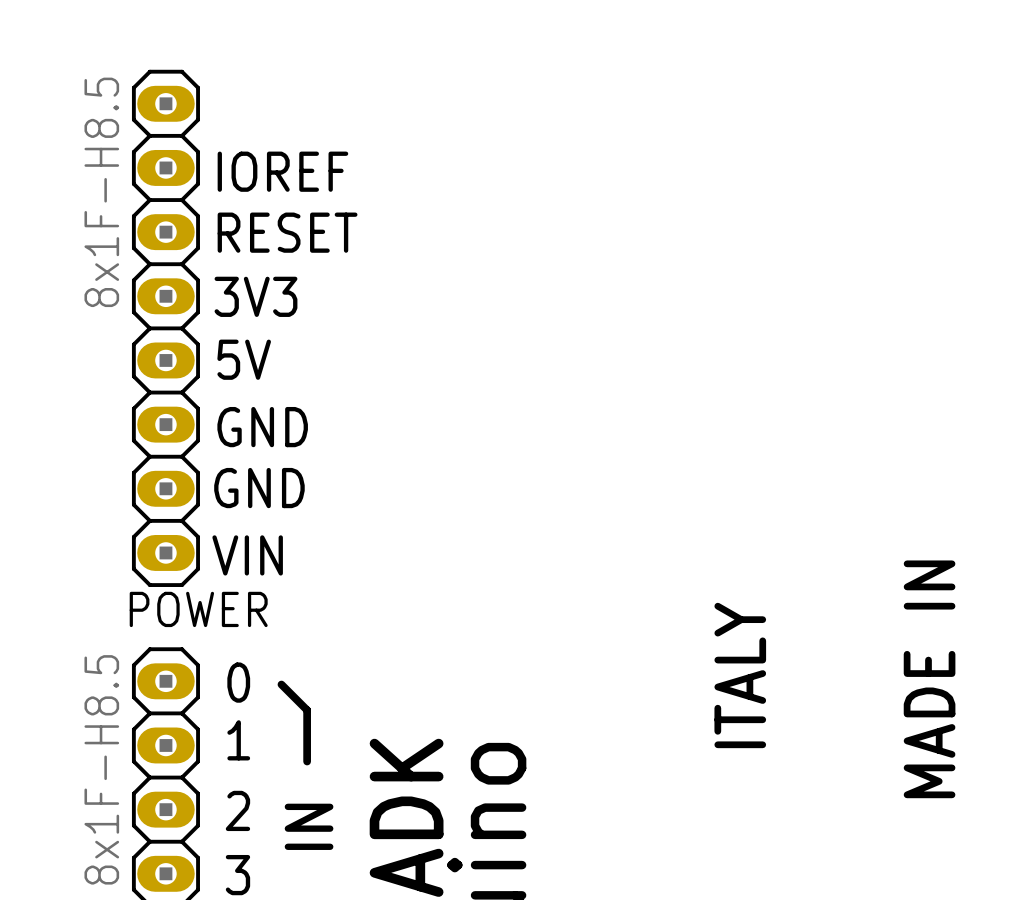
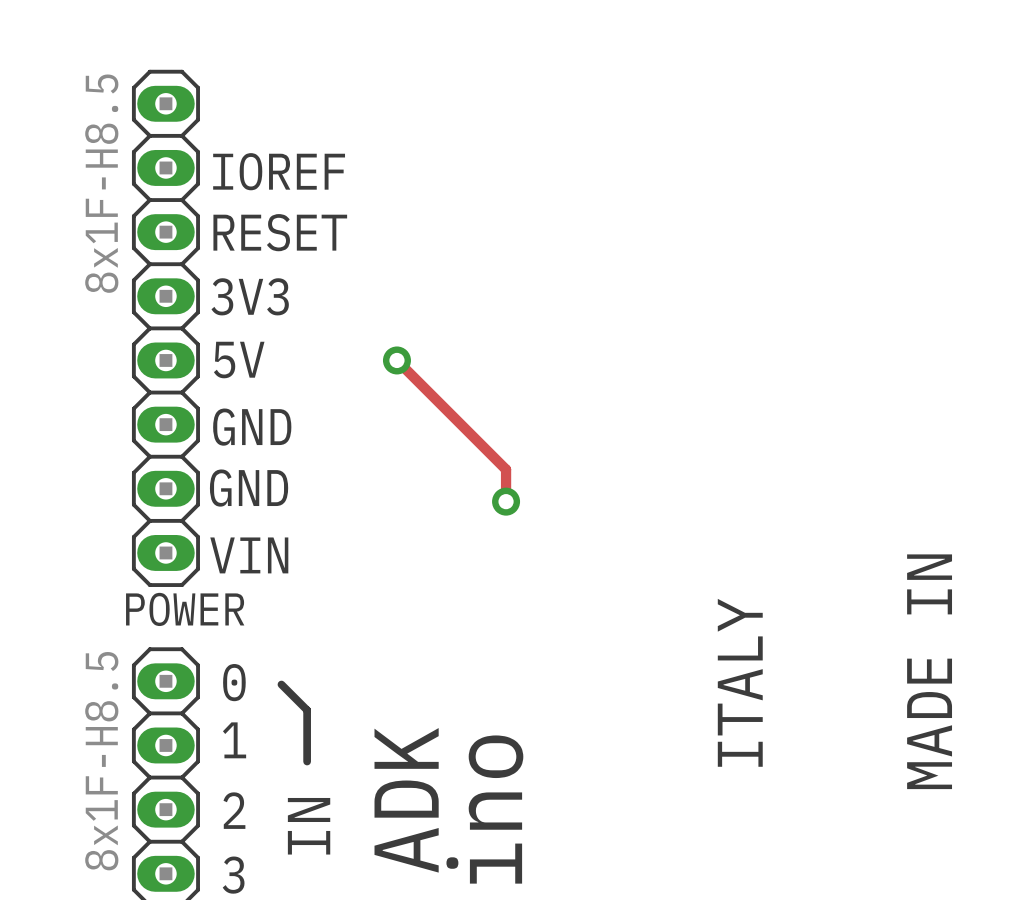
track: none -> (396, 360) (506, 469) (506, 501)
via: none -> (396, 360)
via: none -> (506, 501)

